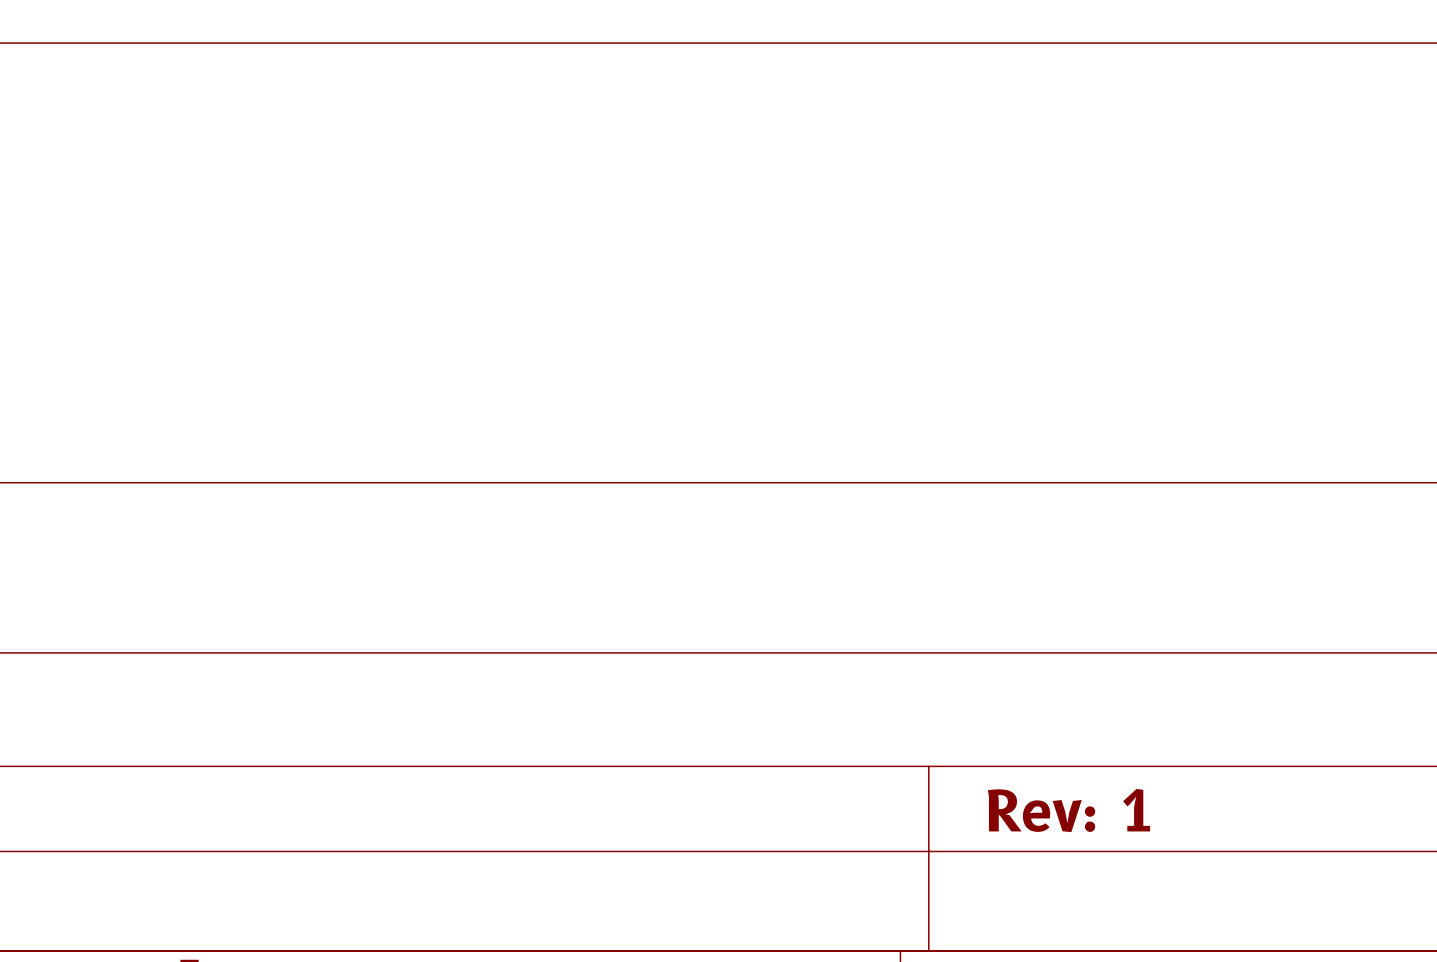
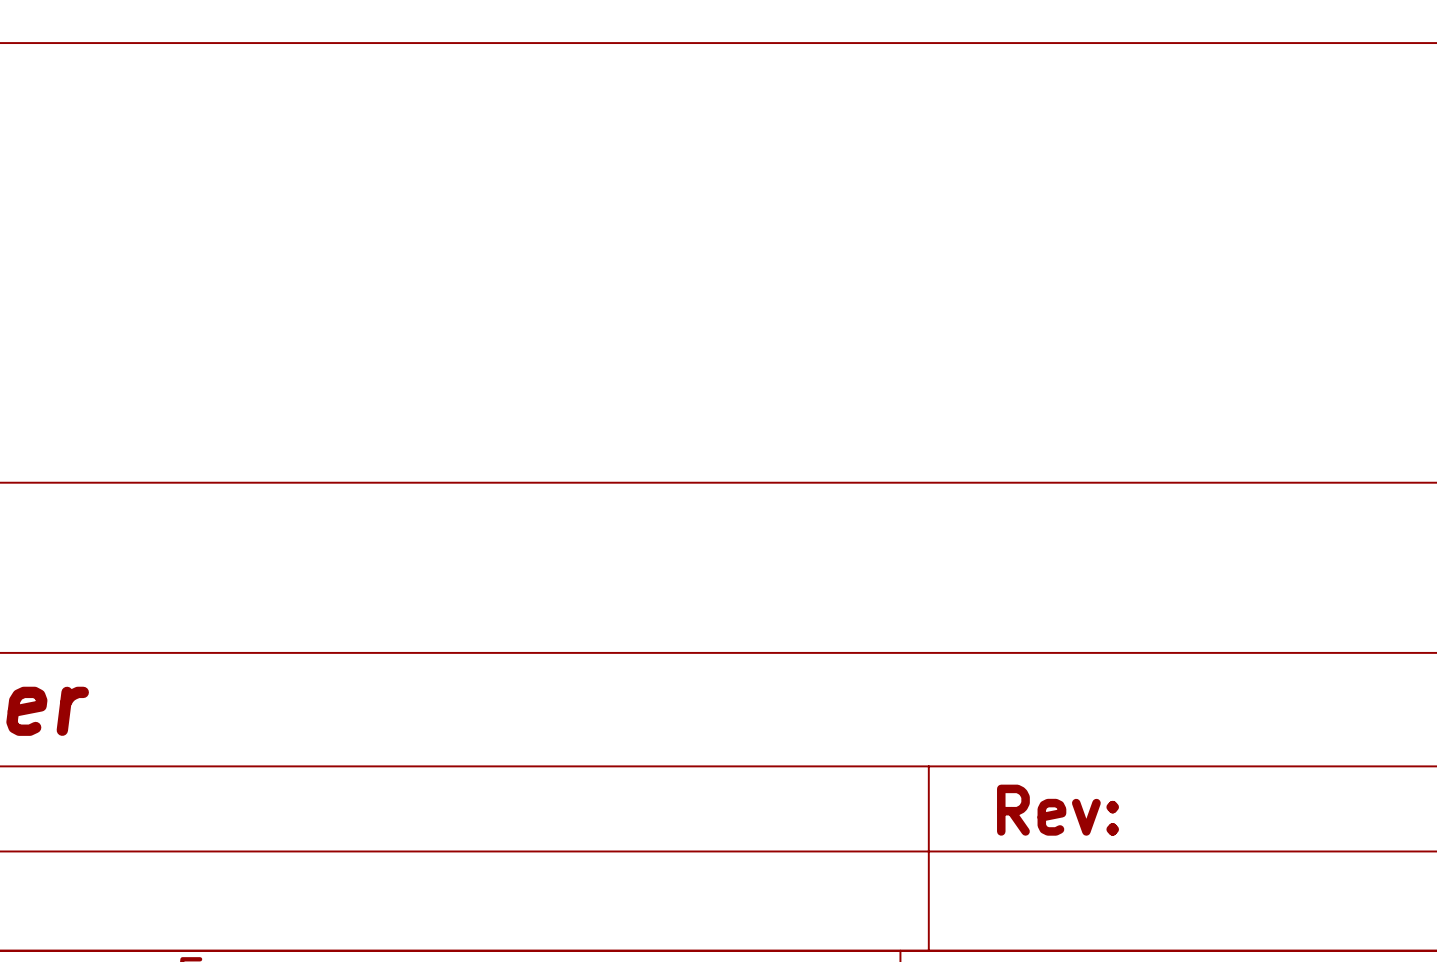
title block: Rev: 1 (1068, 810) -> Rev: (1058, 810)

